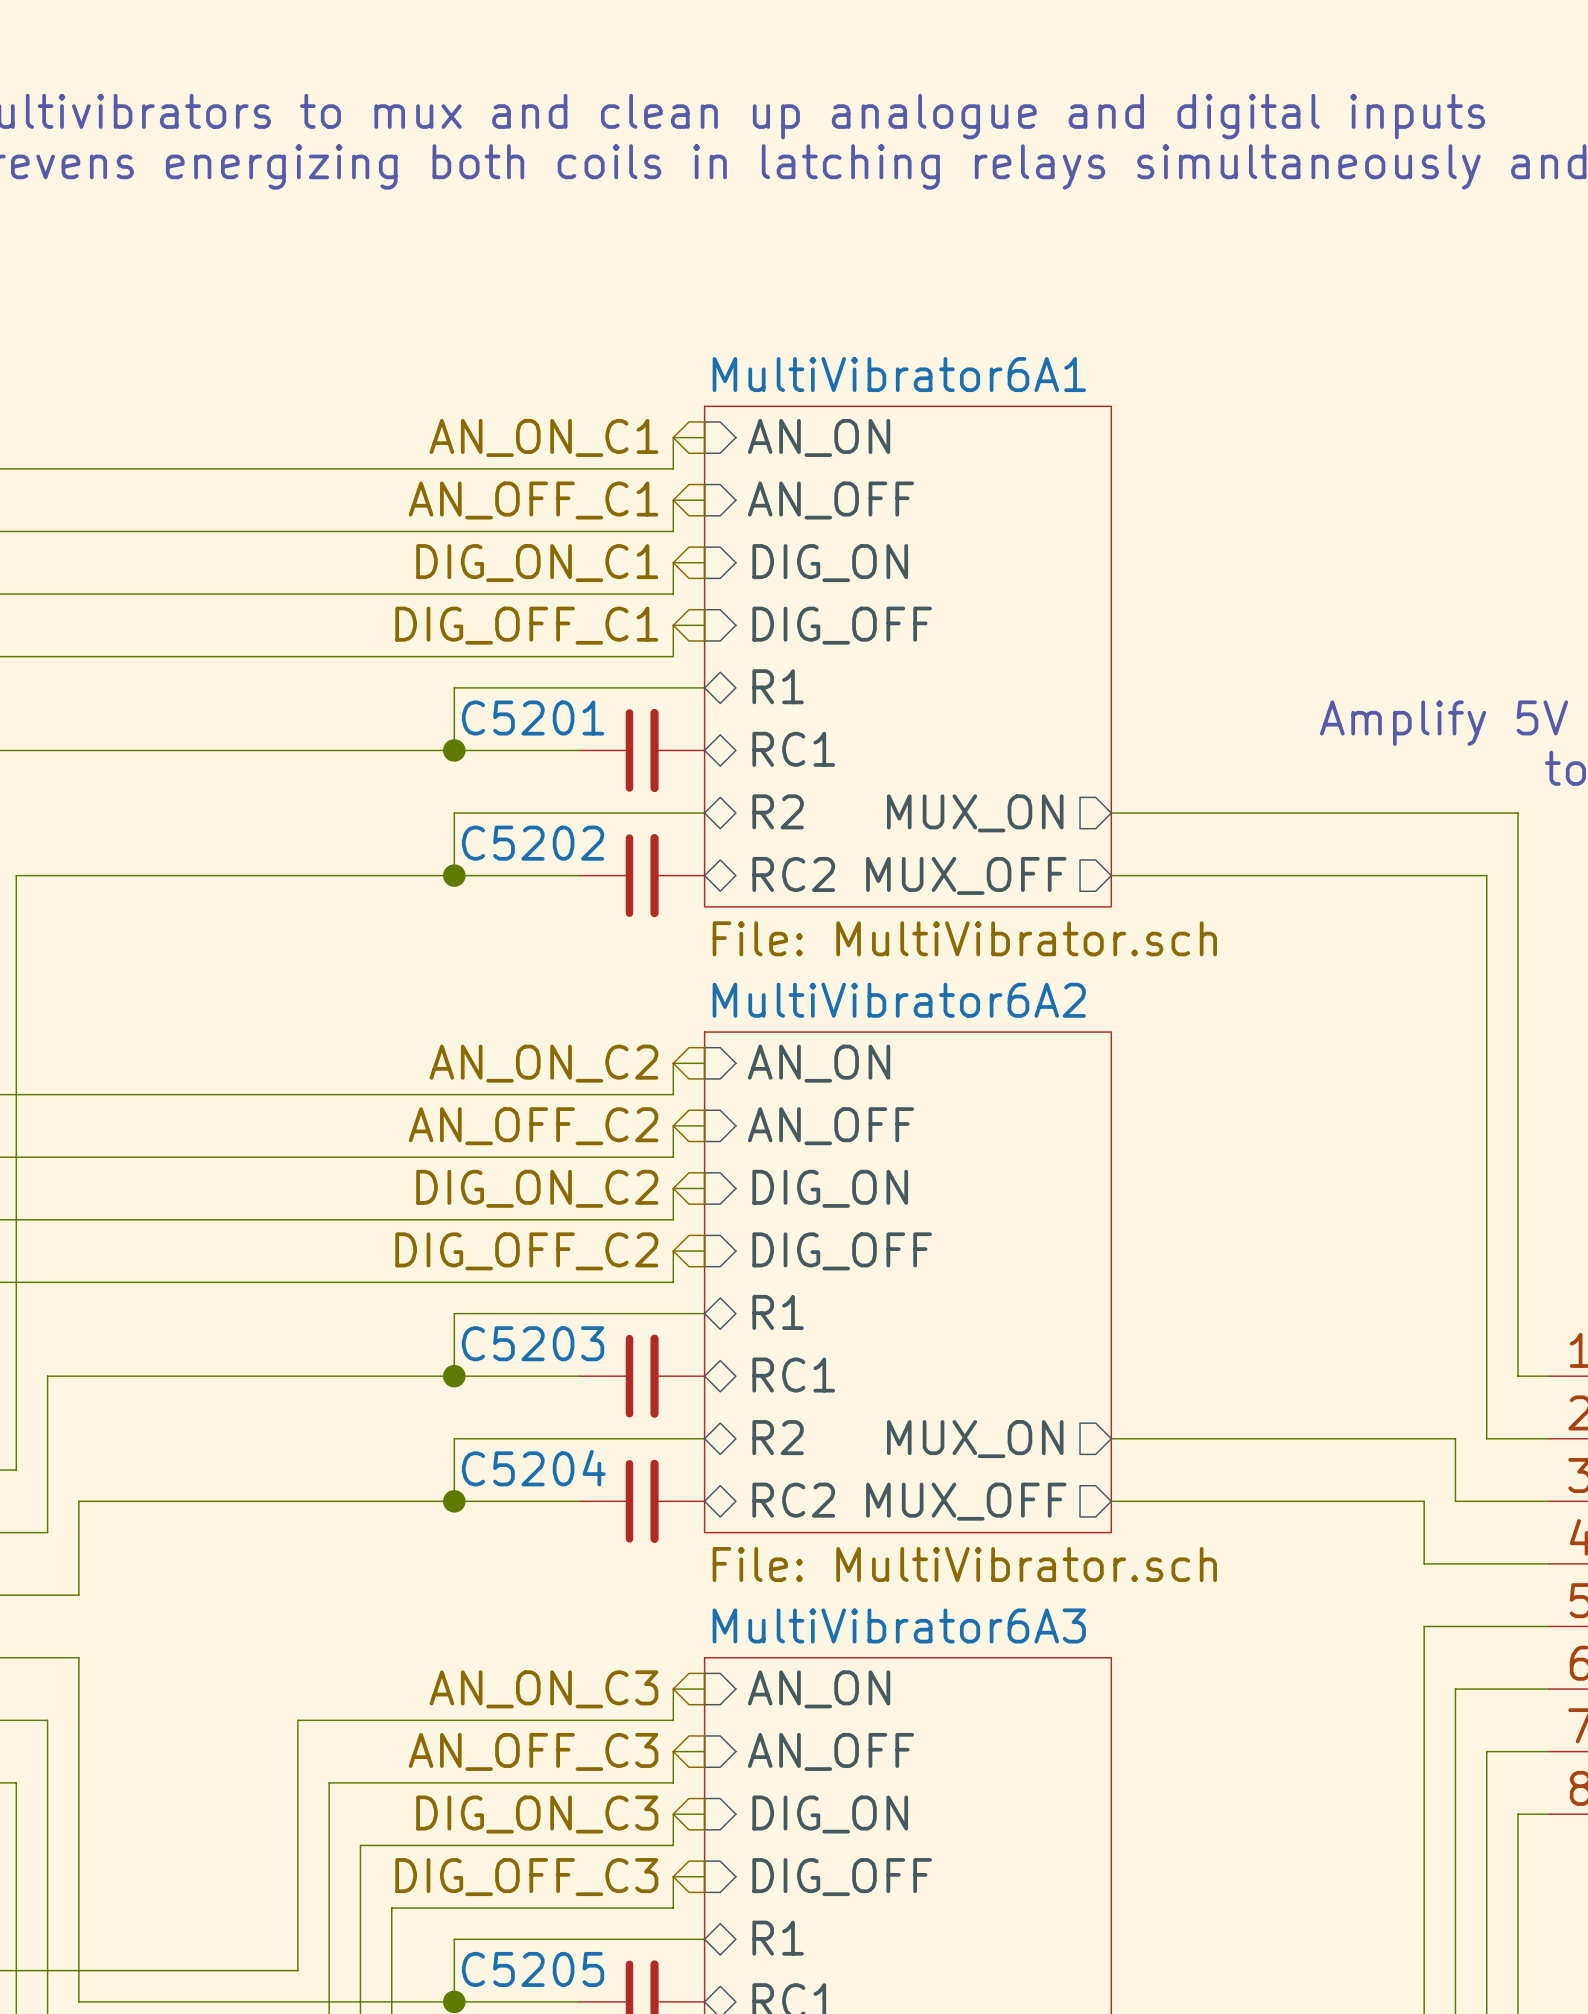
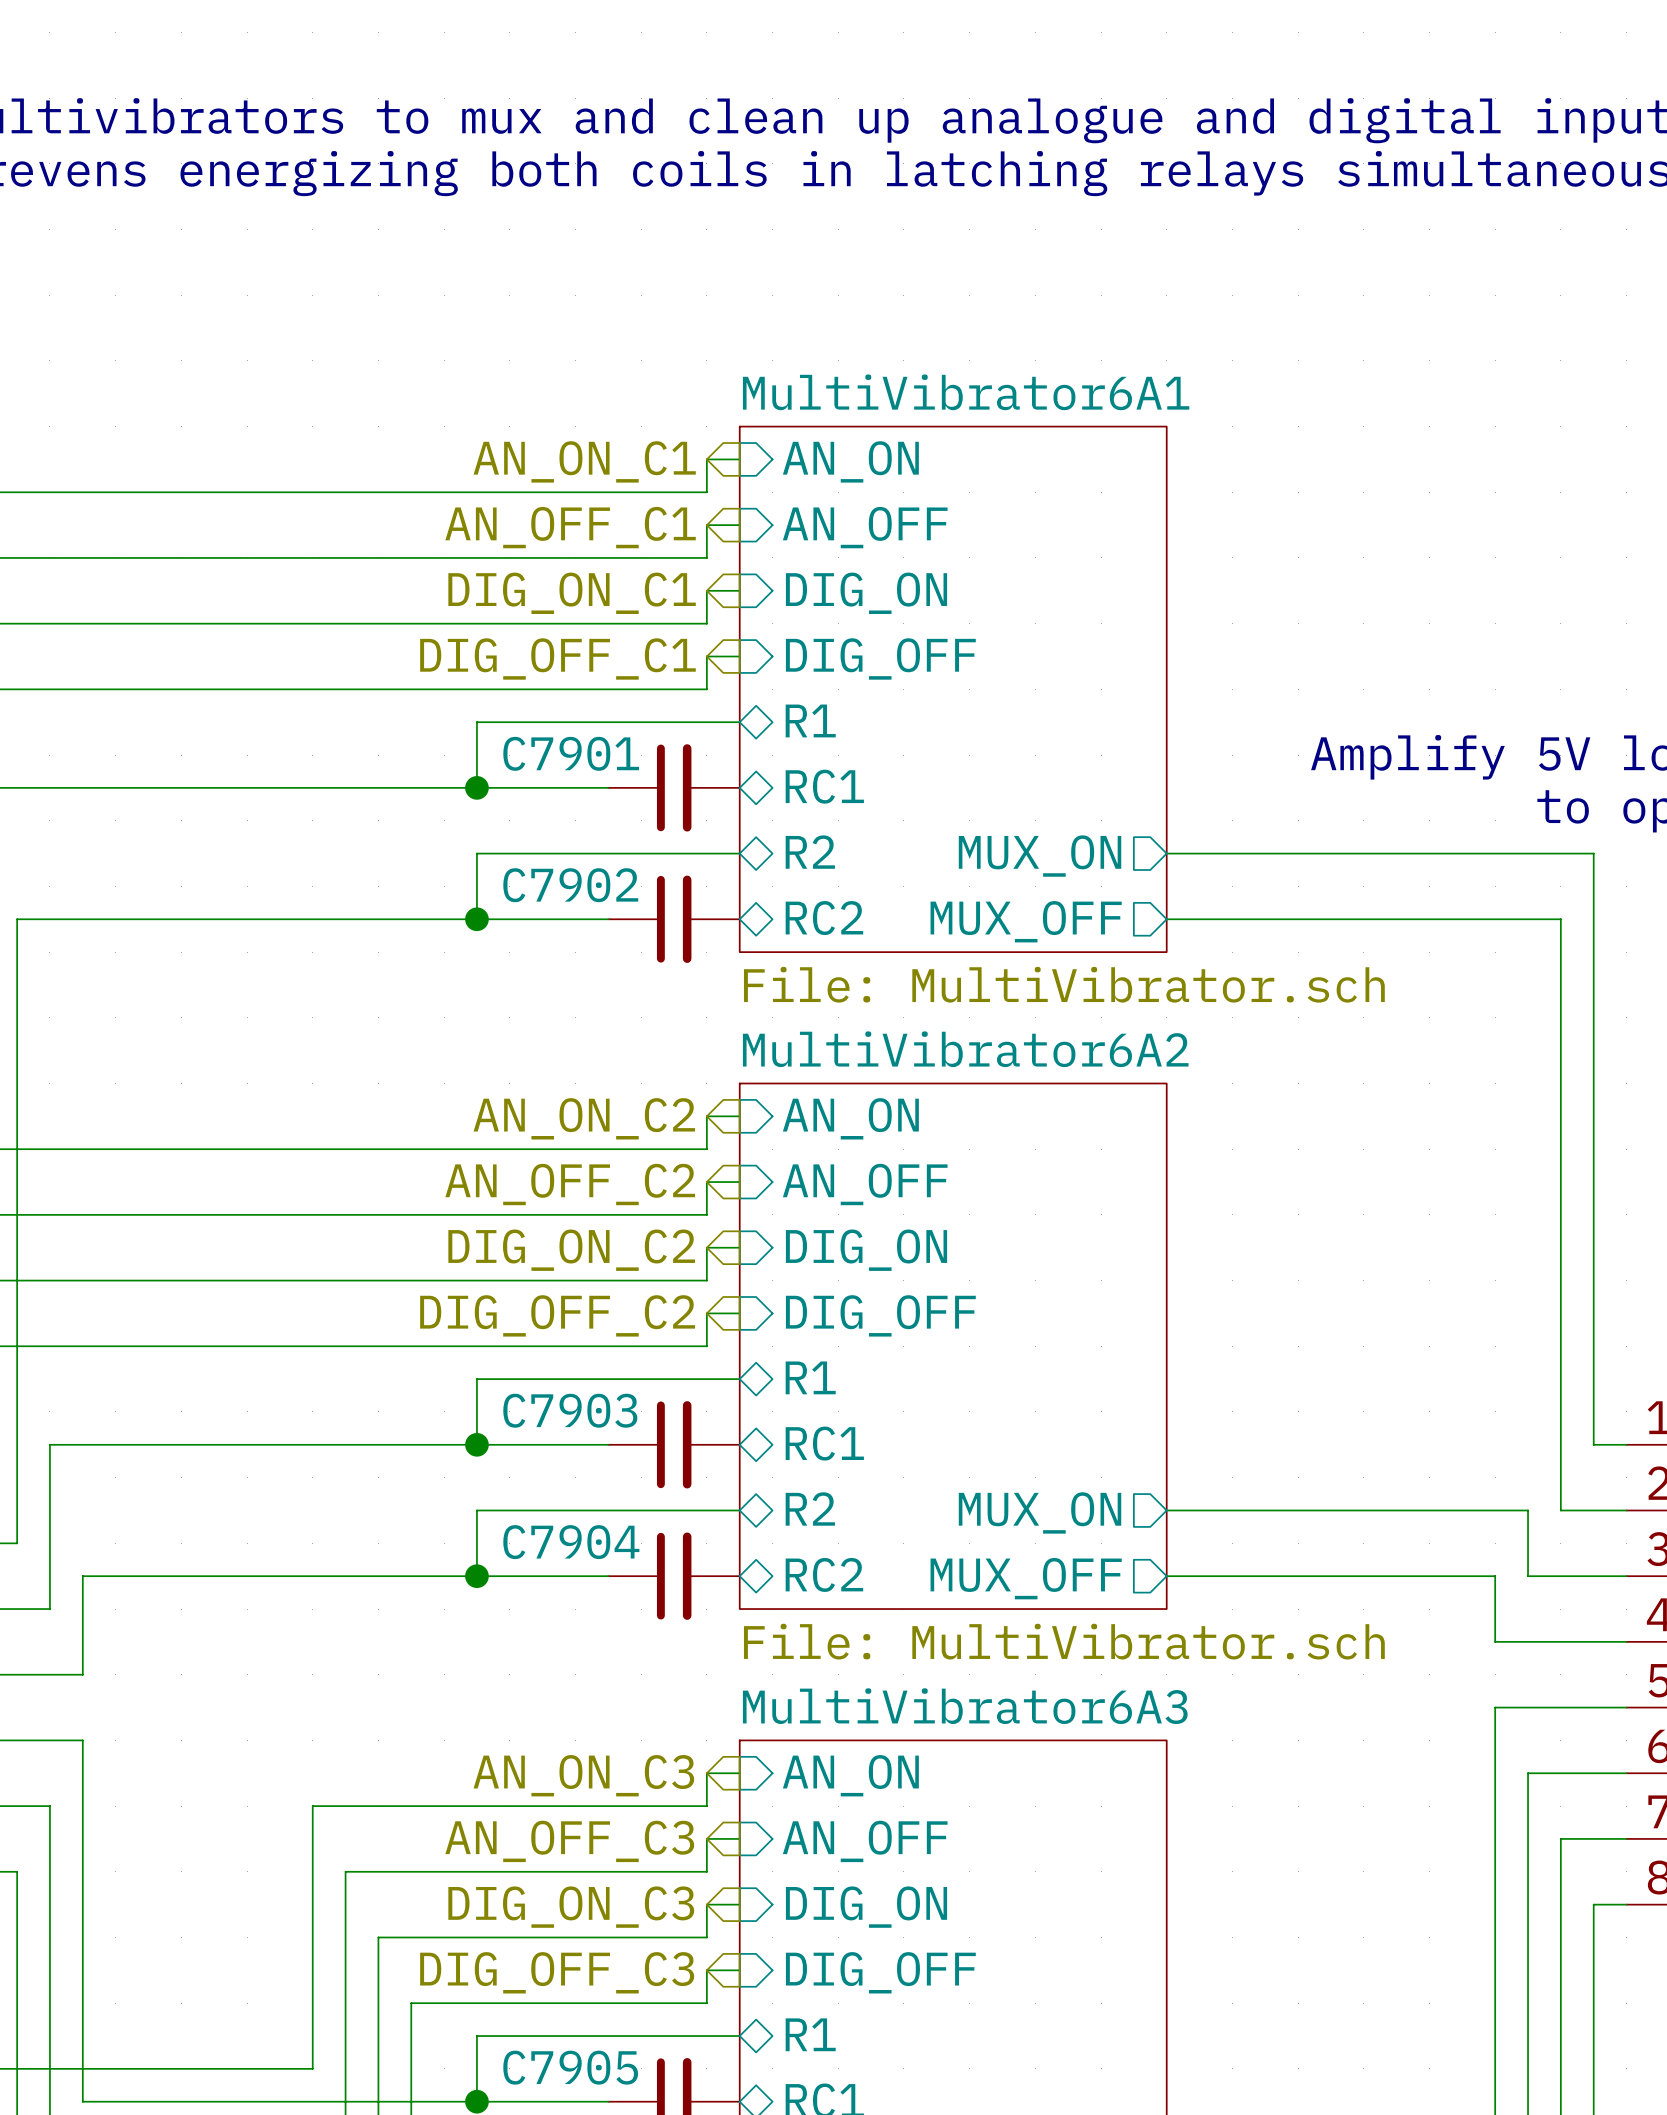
C5201 name: C5201 (533, 718) -> C7901 (571, 753)
C5202 name: C5202 (533, 843) -> C7902 (570, 885)
C5203 name: C5203 (533, 1343) -> C7903 (570, 1410)
C5204 name: C5204 (533, 1468) -> C7904 (571, 1542)
C5205 name: C5205 (533, 1969) -> C7905 (570, 2067)

